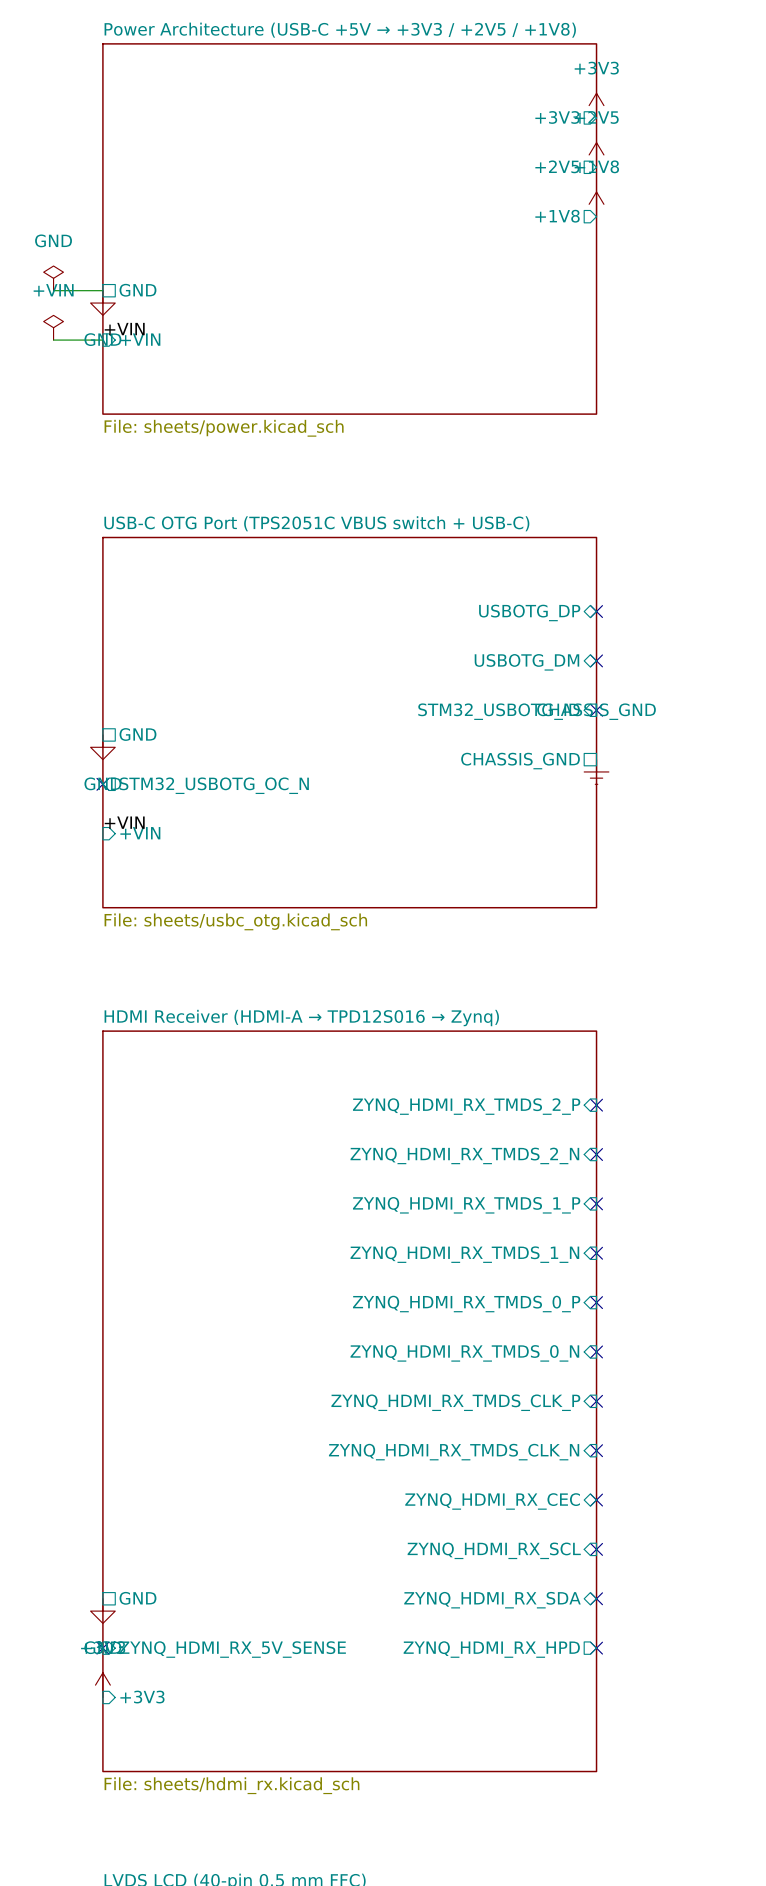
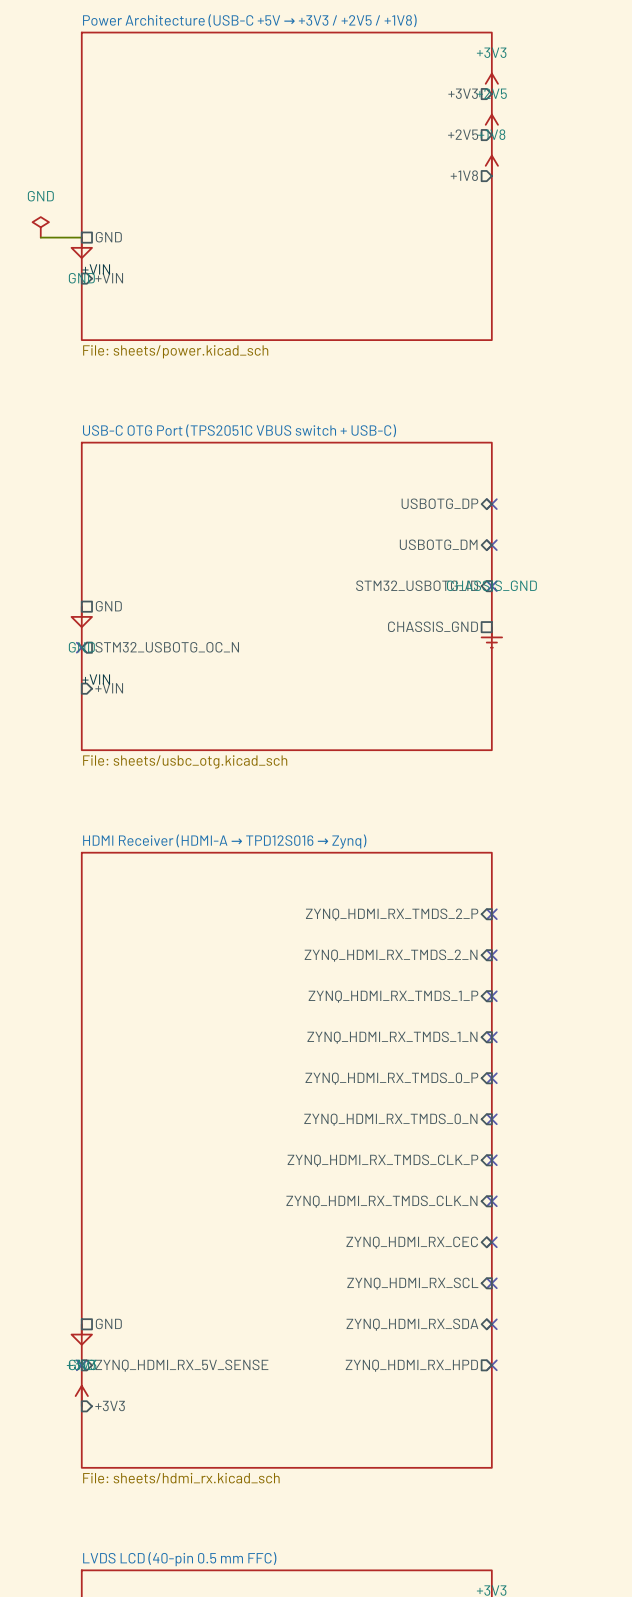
power symbol: +VIN (53, 327) -> none
wire: (53, 340) (102, 340) -> none

